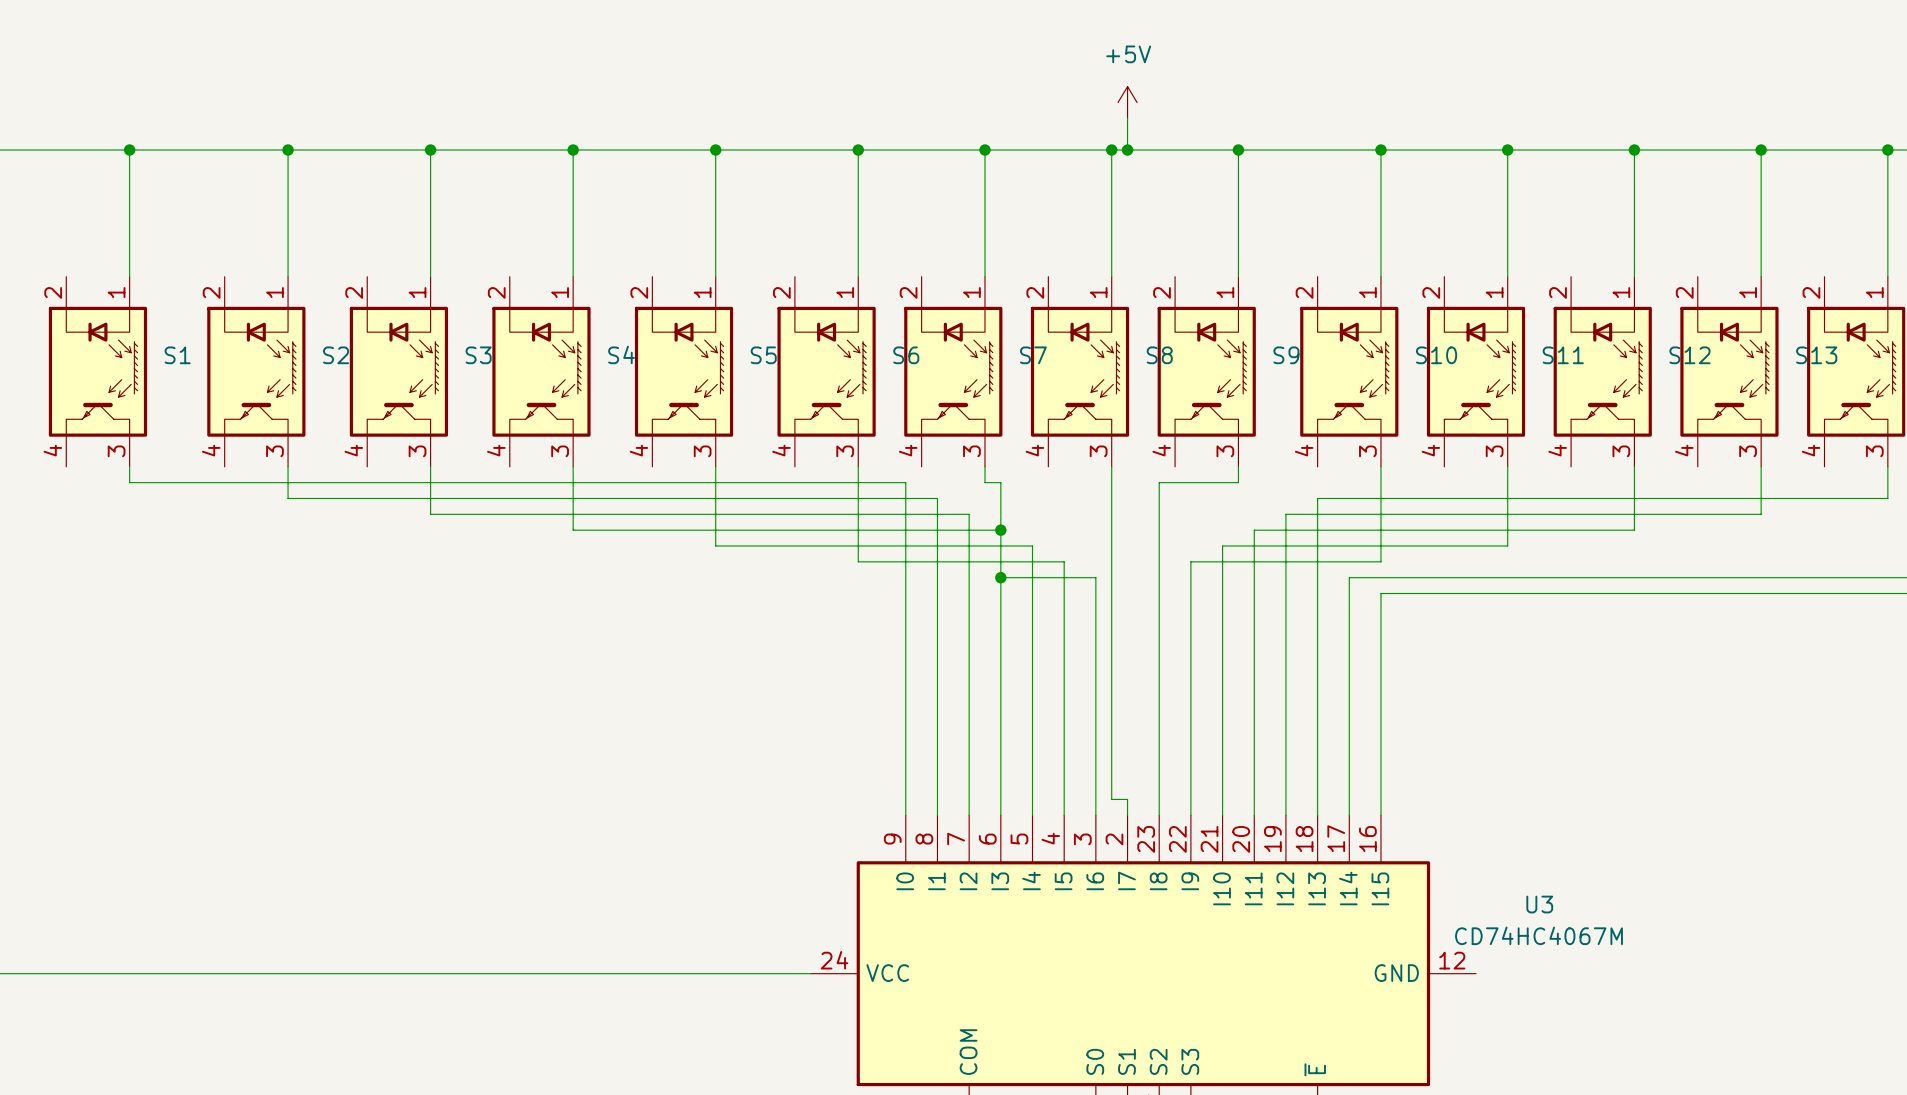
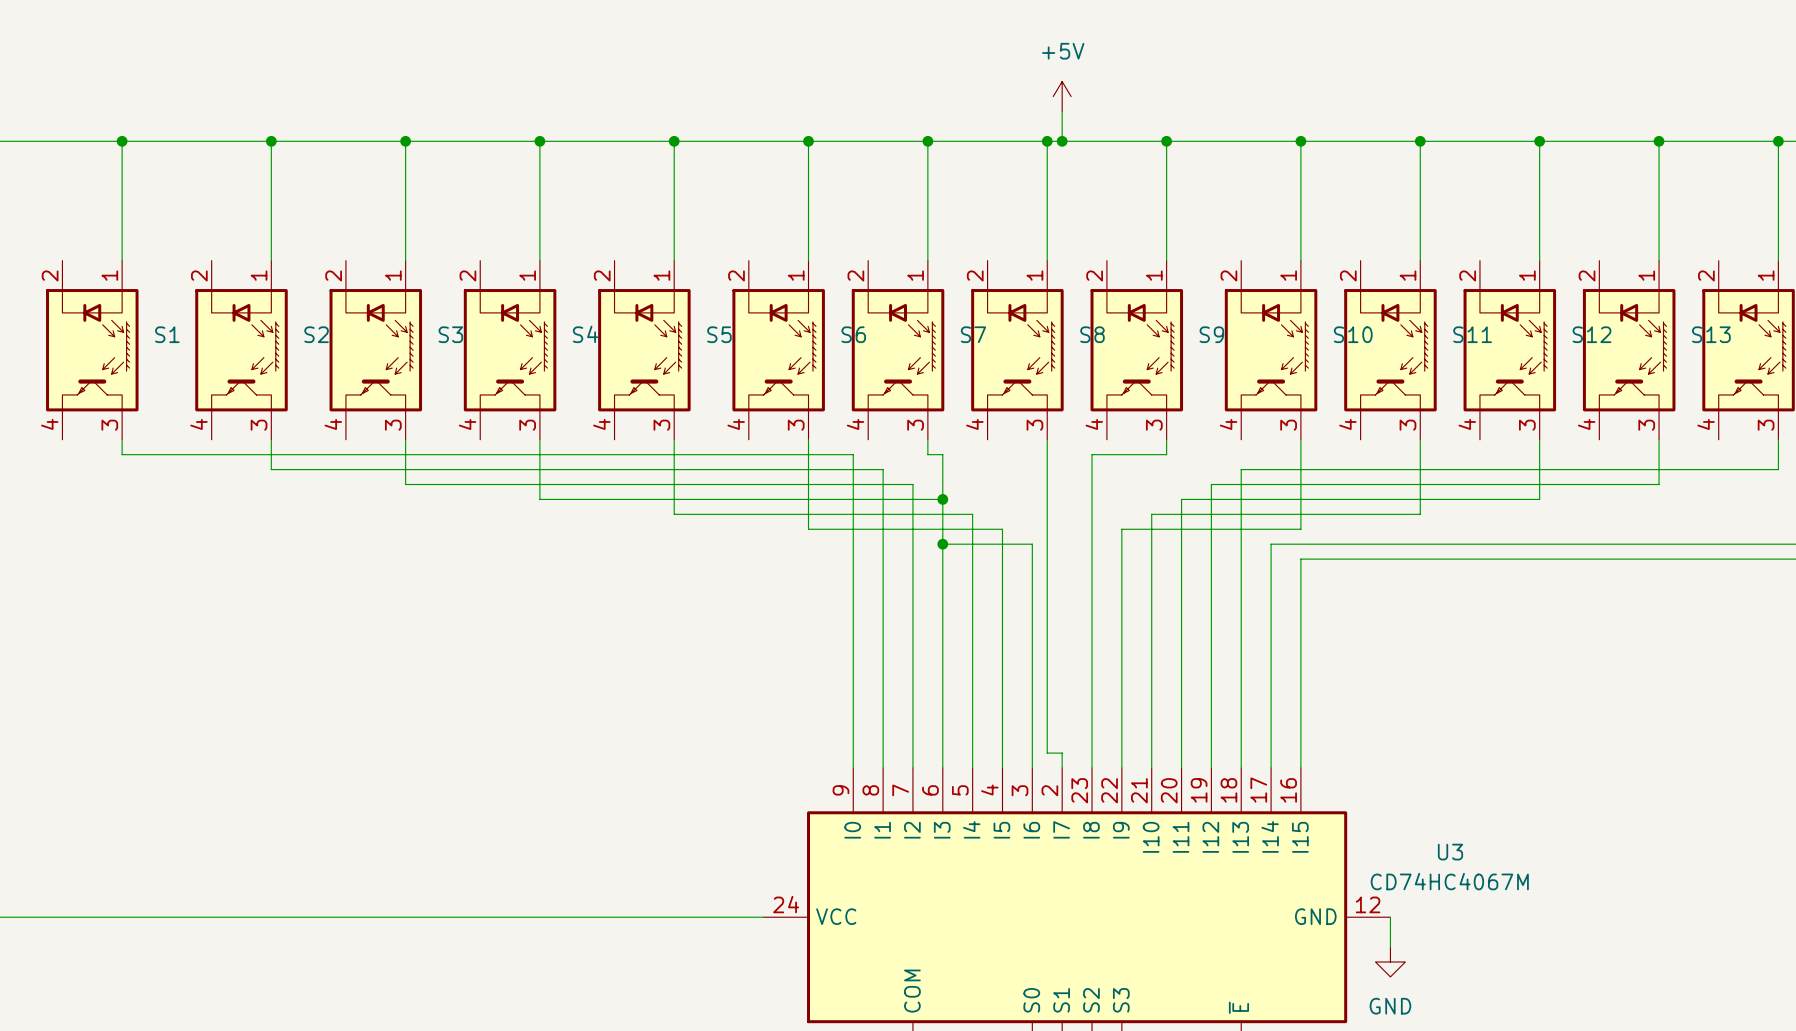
wire: none -> (1390, 917) (1390, 947)
power symbol: none -> GND (1390, 961)

